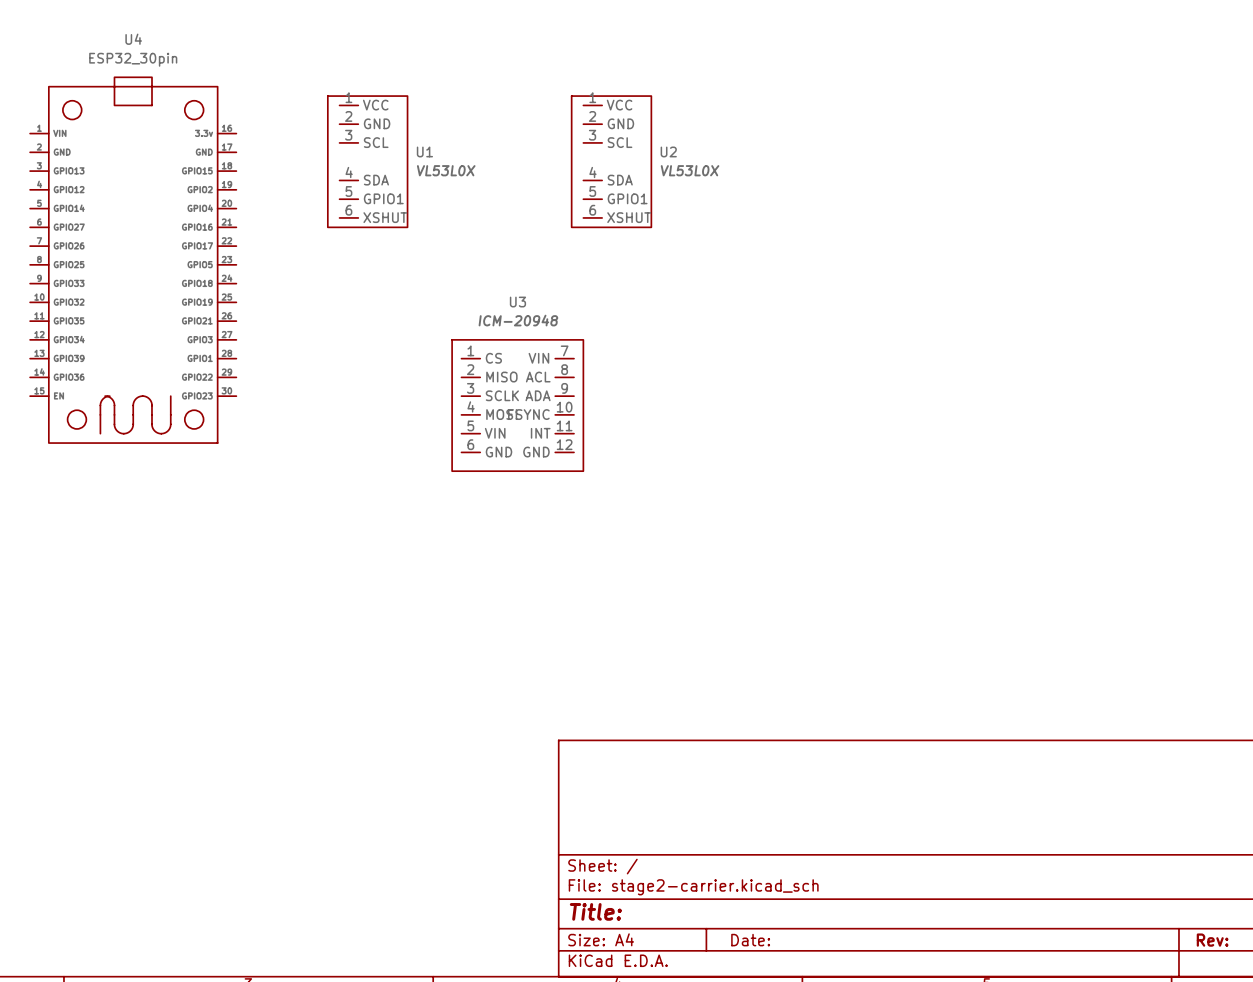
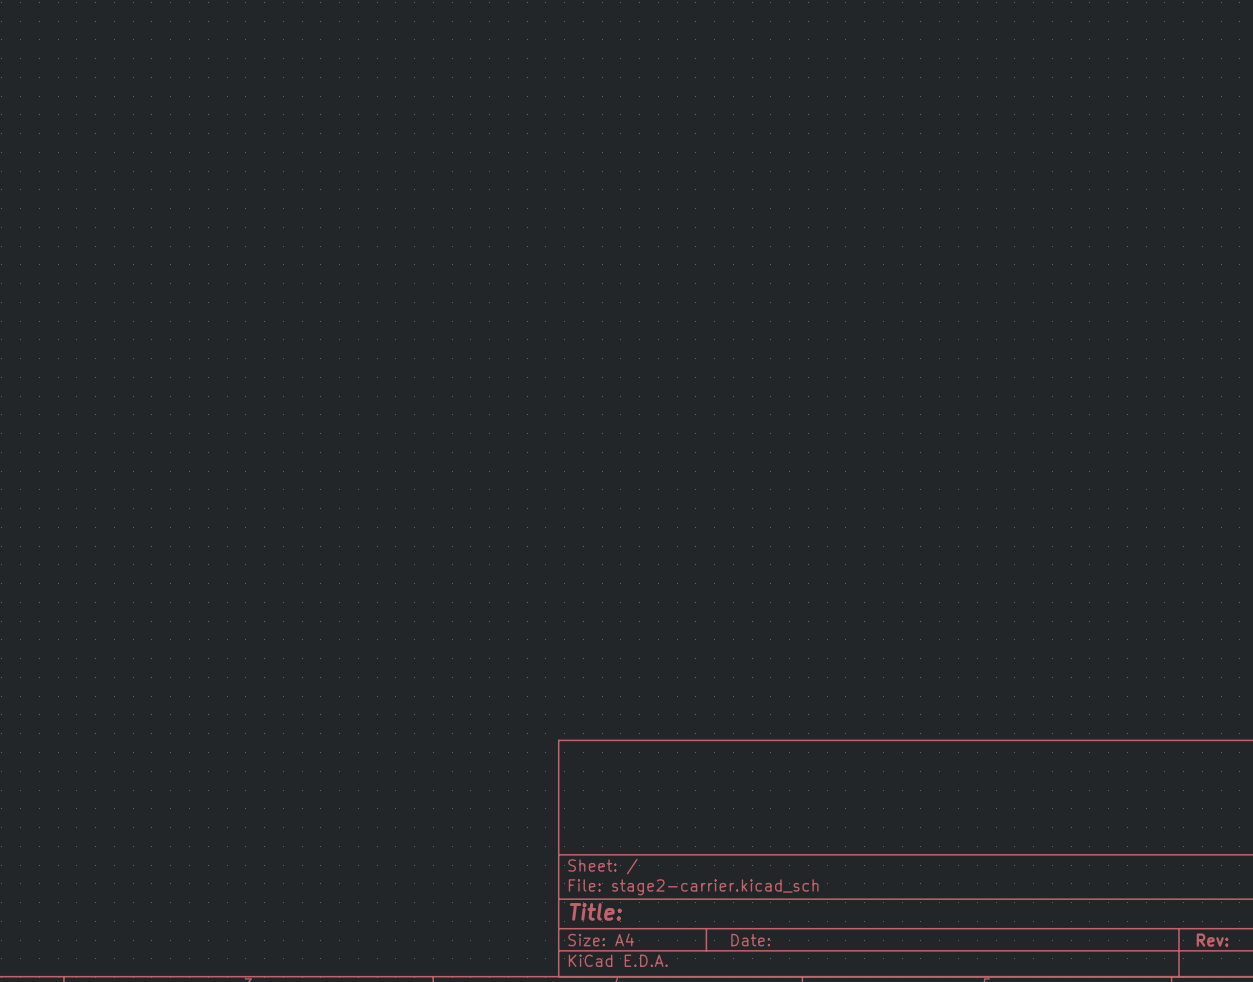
U1: VL53L0X (367, 161) -> none
U2: VL53L0X (611, 161) -> none
U4: (133, 260) -> none
U3: ICM-20948 (517, 405) -> none

